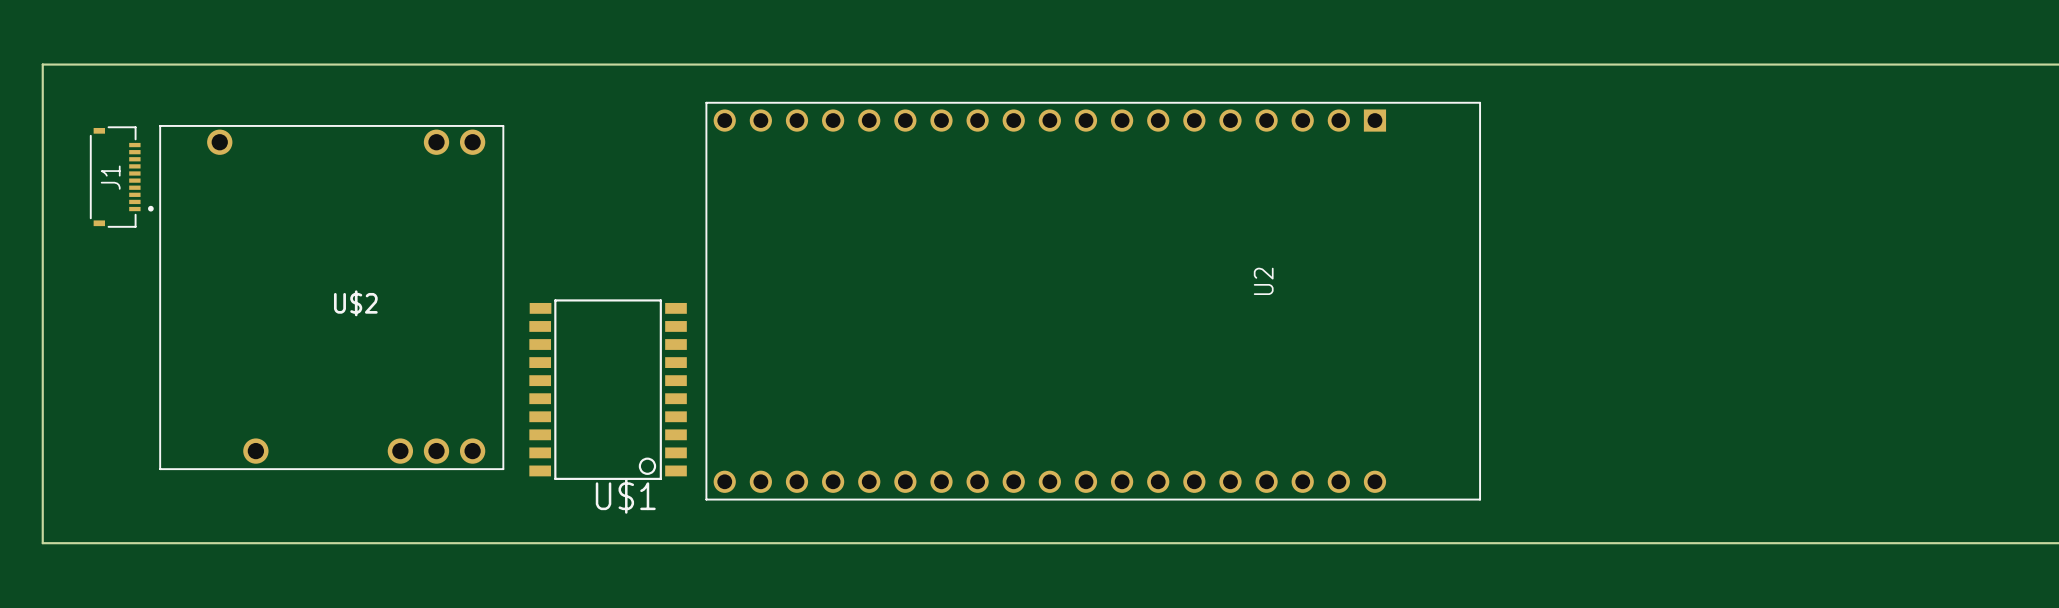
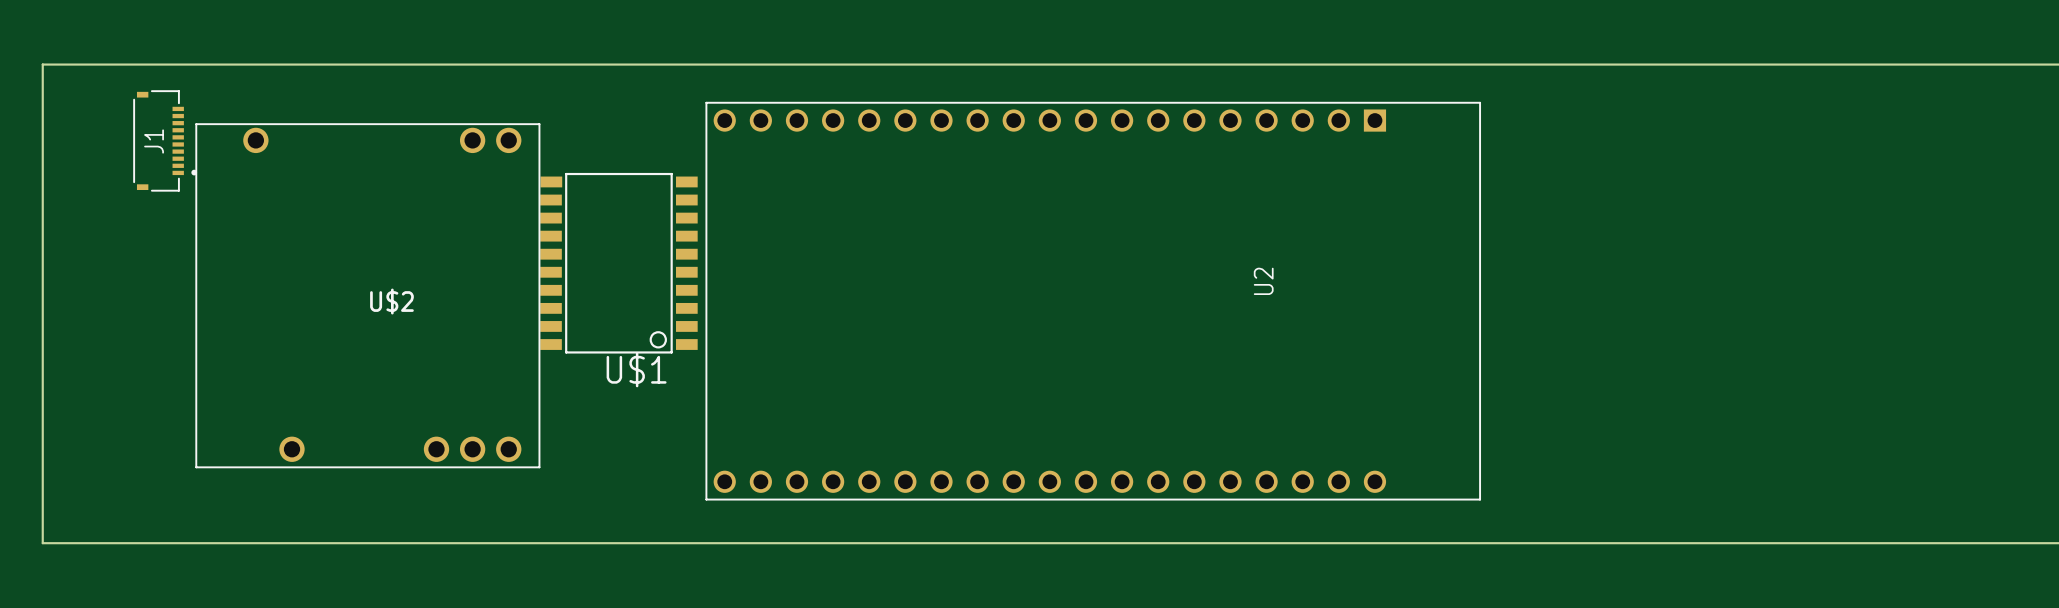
J1 position: (121, 177) -> (165, 140)
U$2 position: (331, 297) -> (367, 295)
U$1 position: (608, 389) -> (618, 263)

